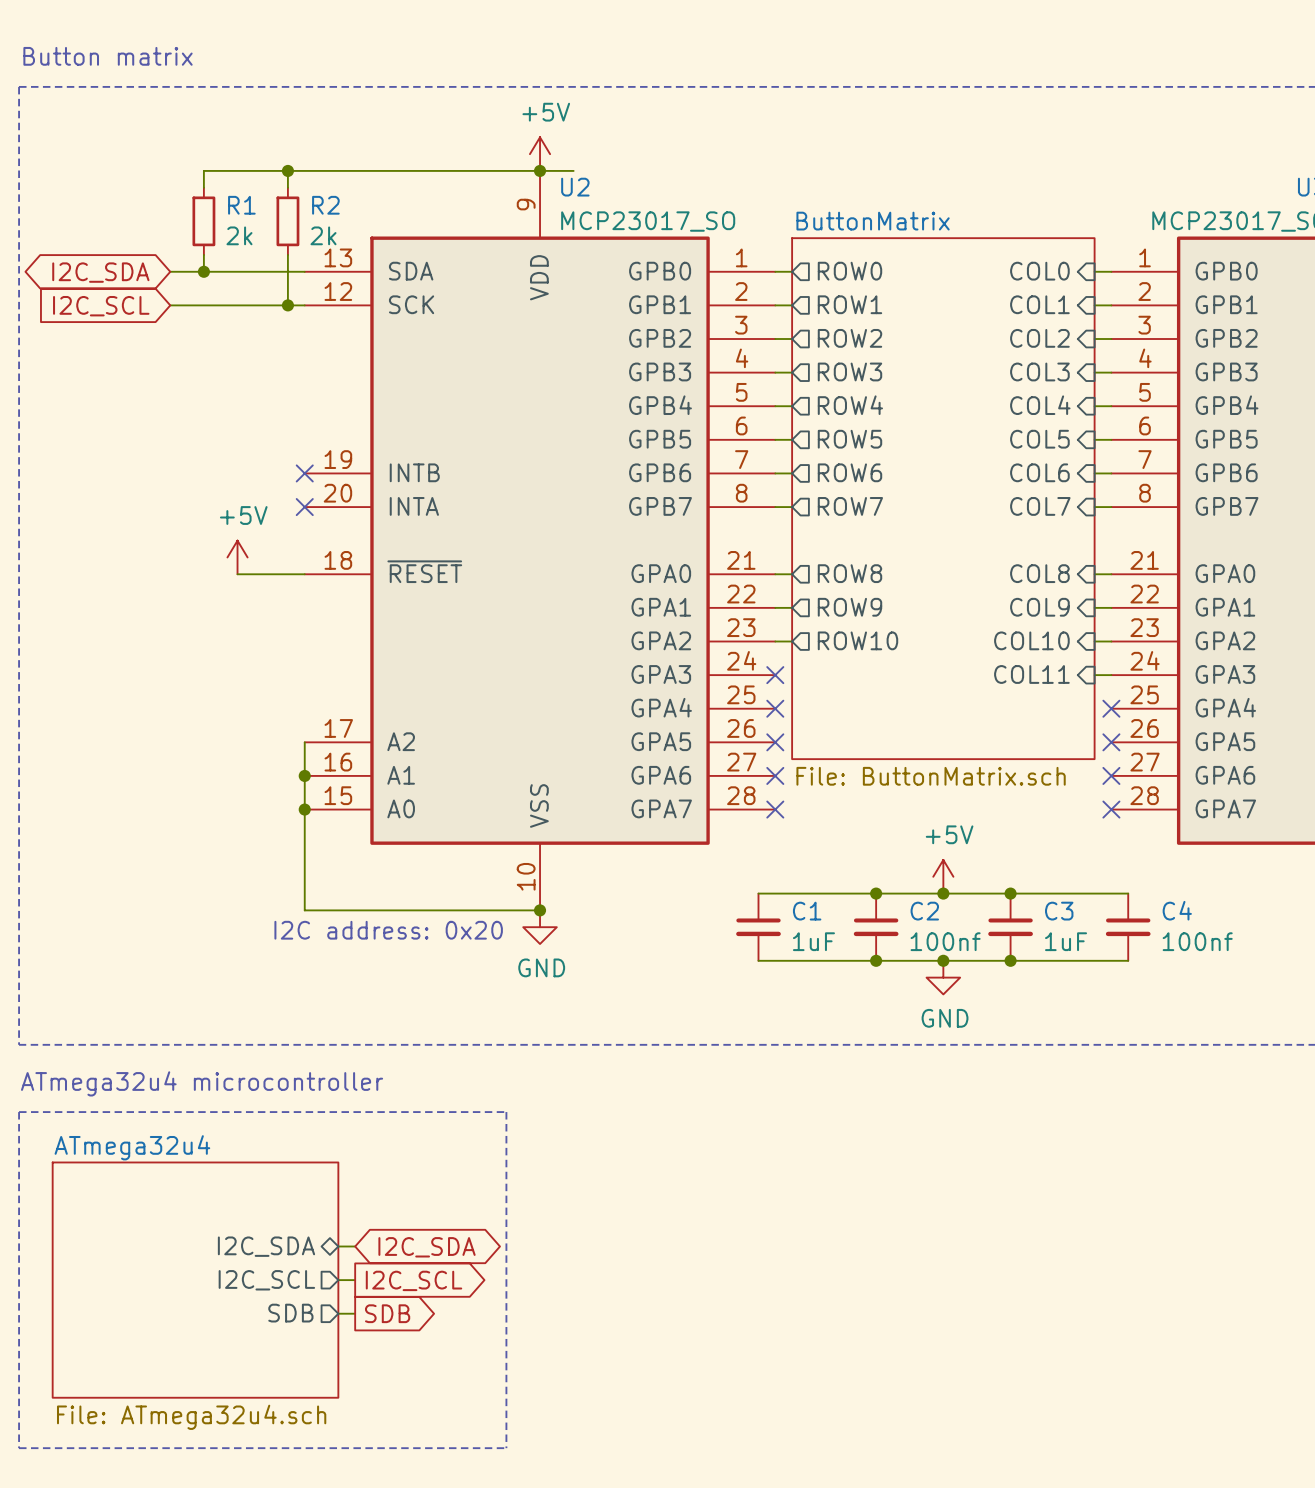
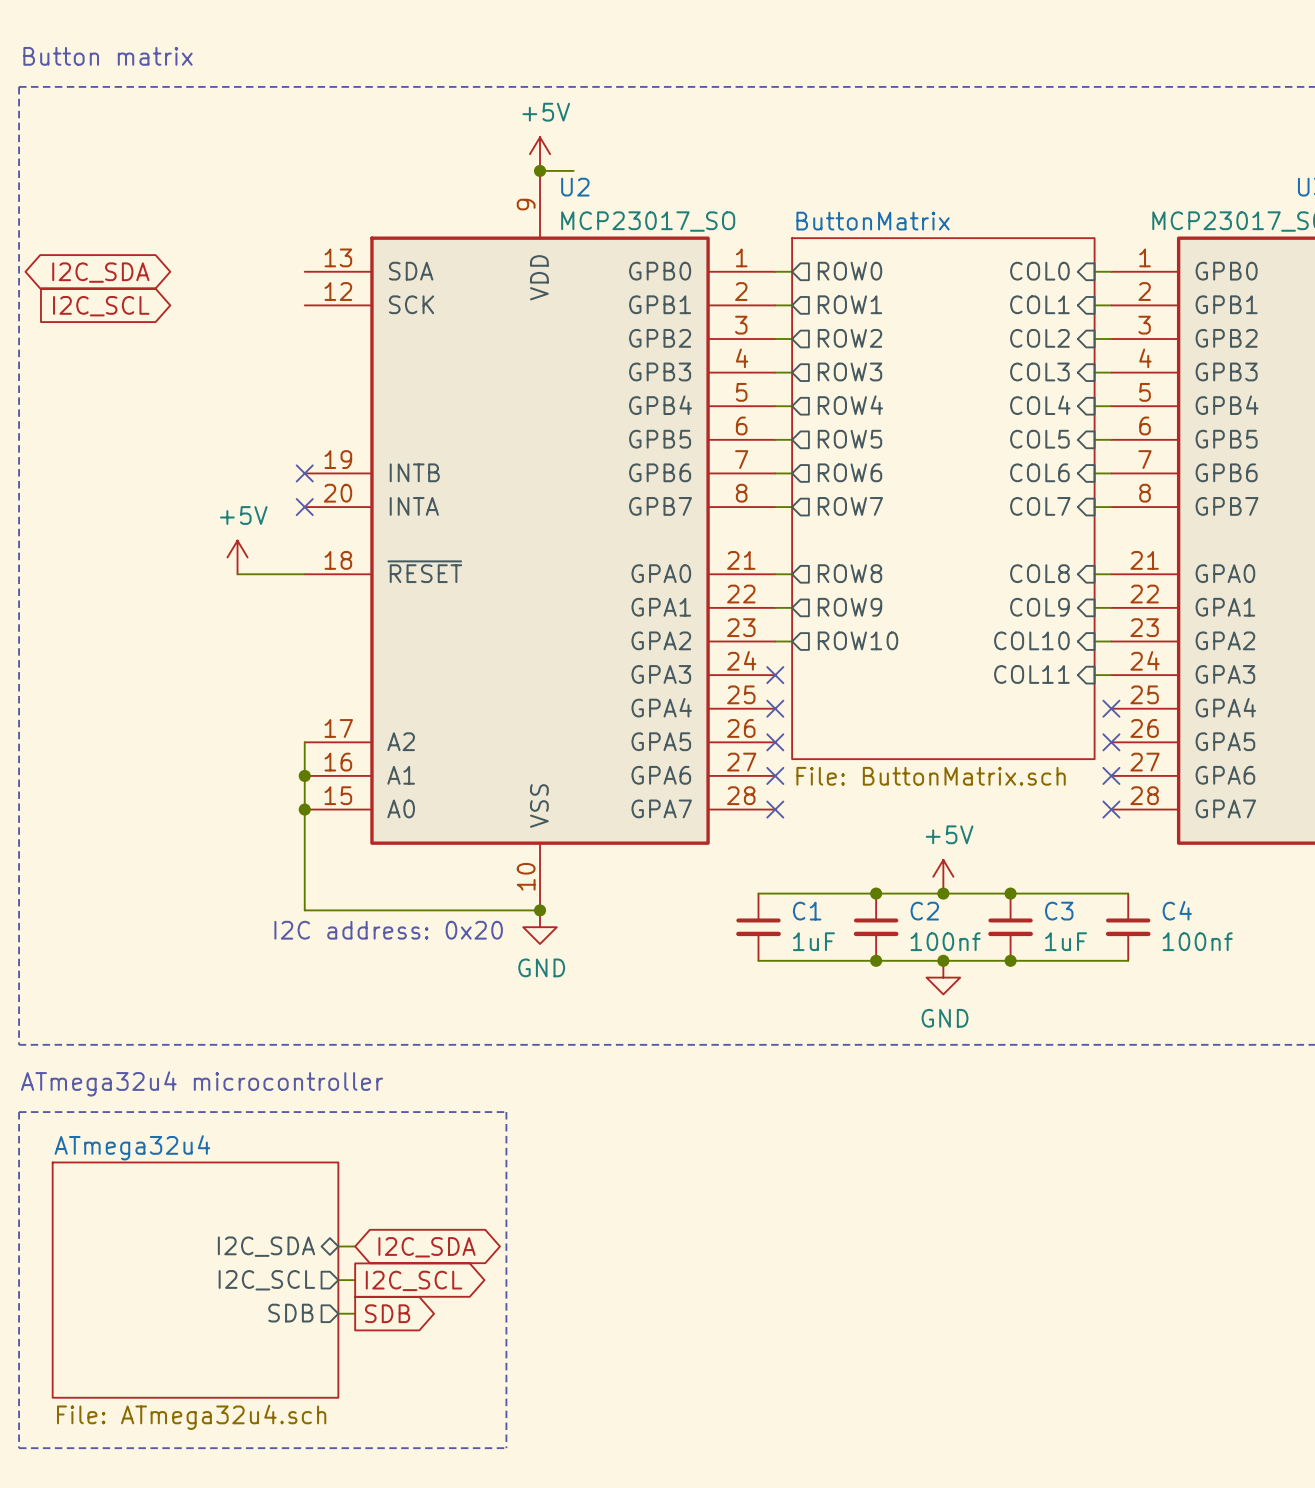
wire: (287, 170) (287, 187) -> none
junction: (287, 170) -> none
wire: (540, 170) (203, 170) (203, 187) -> none
R1: 2k (203, 221) -> none
R2: 2k (287, 221) -> none
wire: (203, 254) (203, 271) -> none
wire: (287, 254) (287, 305) -> none
wire: (170, 271) (304, 271) -> none
junction: (203, 271) -> none
wire: (170, 305) (304, 305) -> none
junction: (287, 305) -> none

